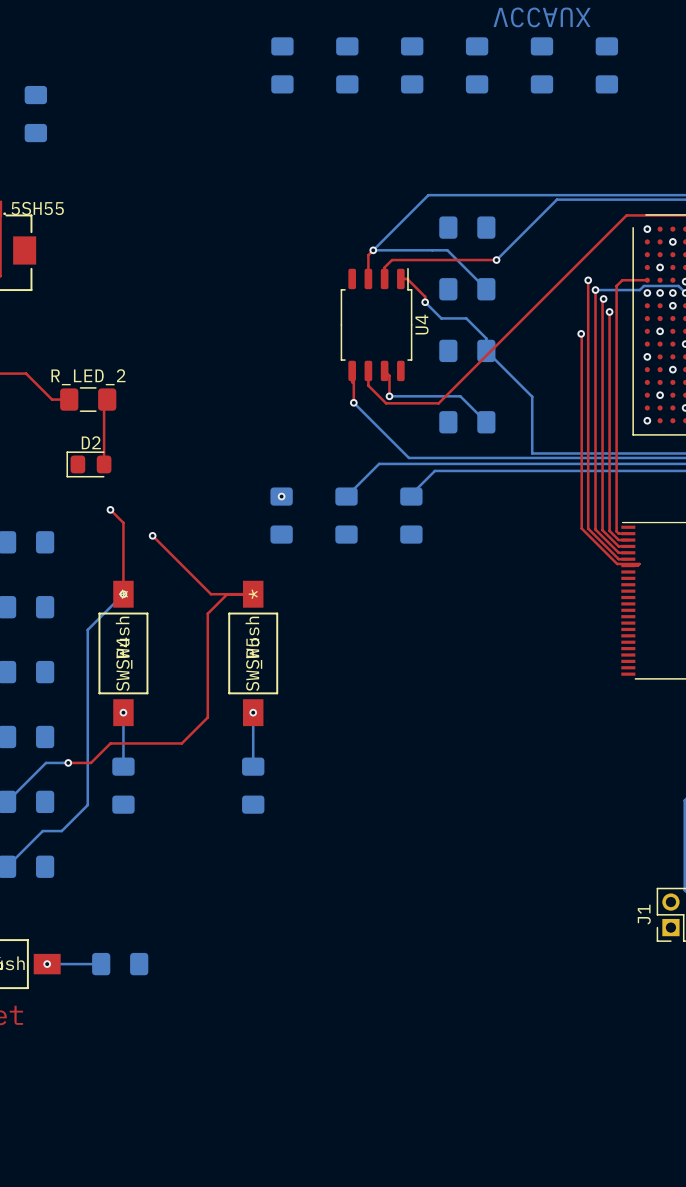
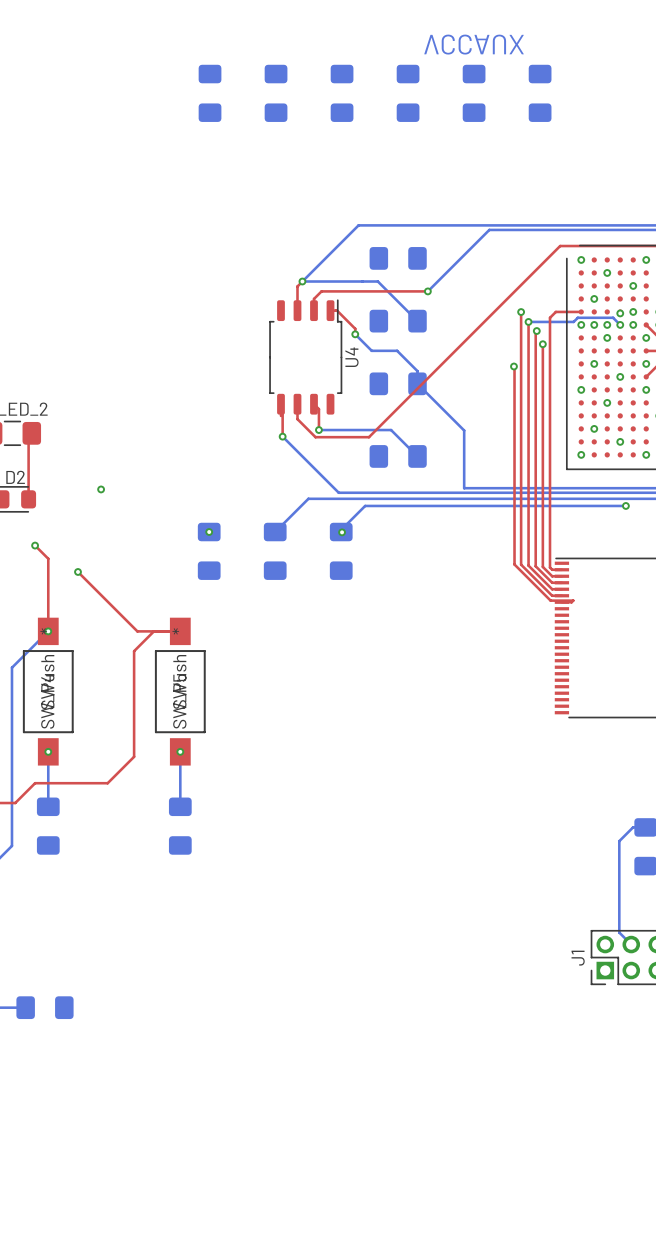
via: none -> (101, 489)
via: none -> (342, 532)

